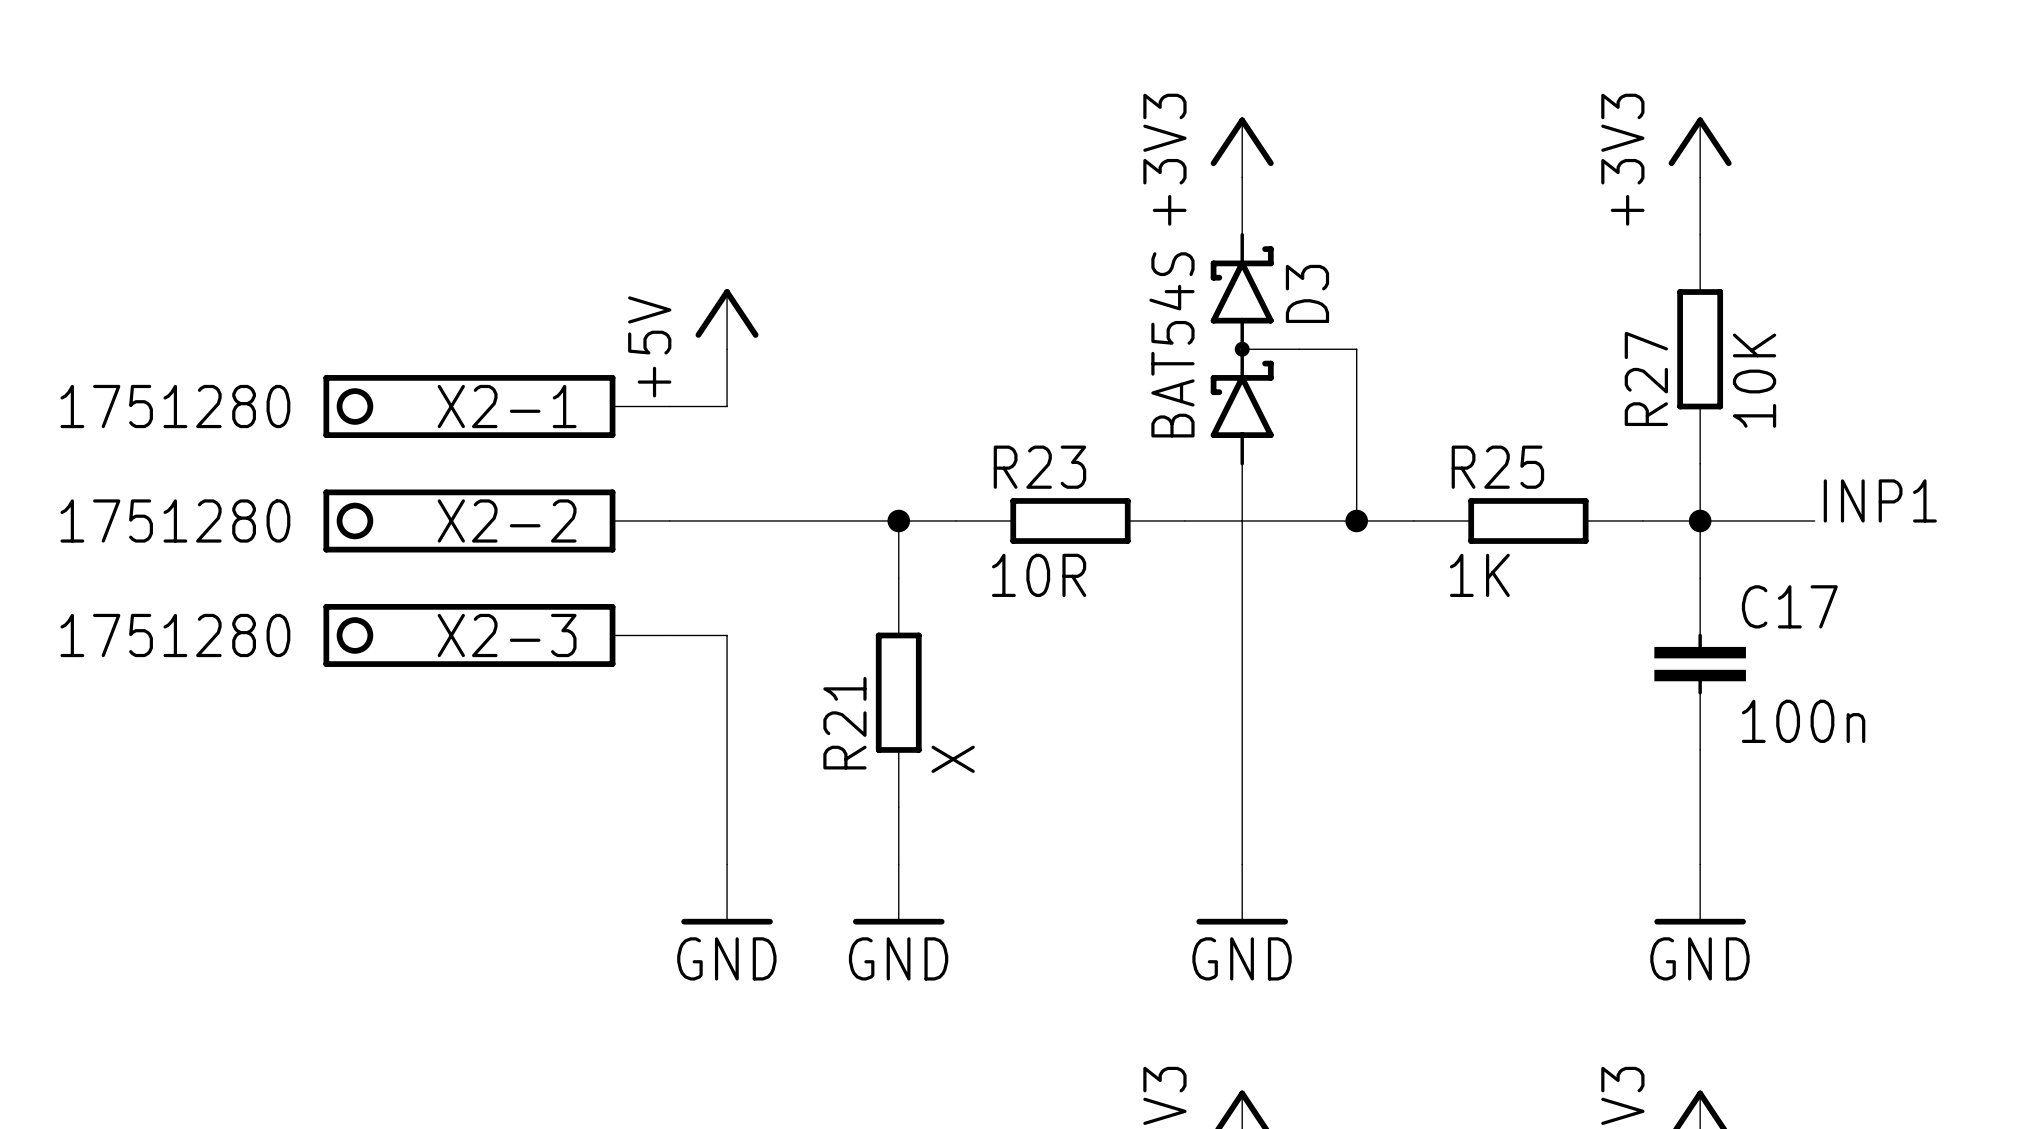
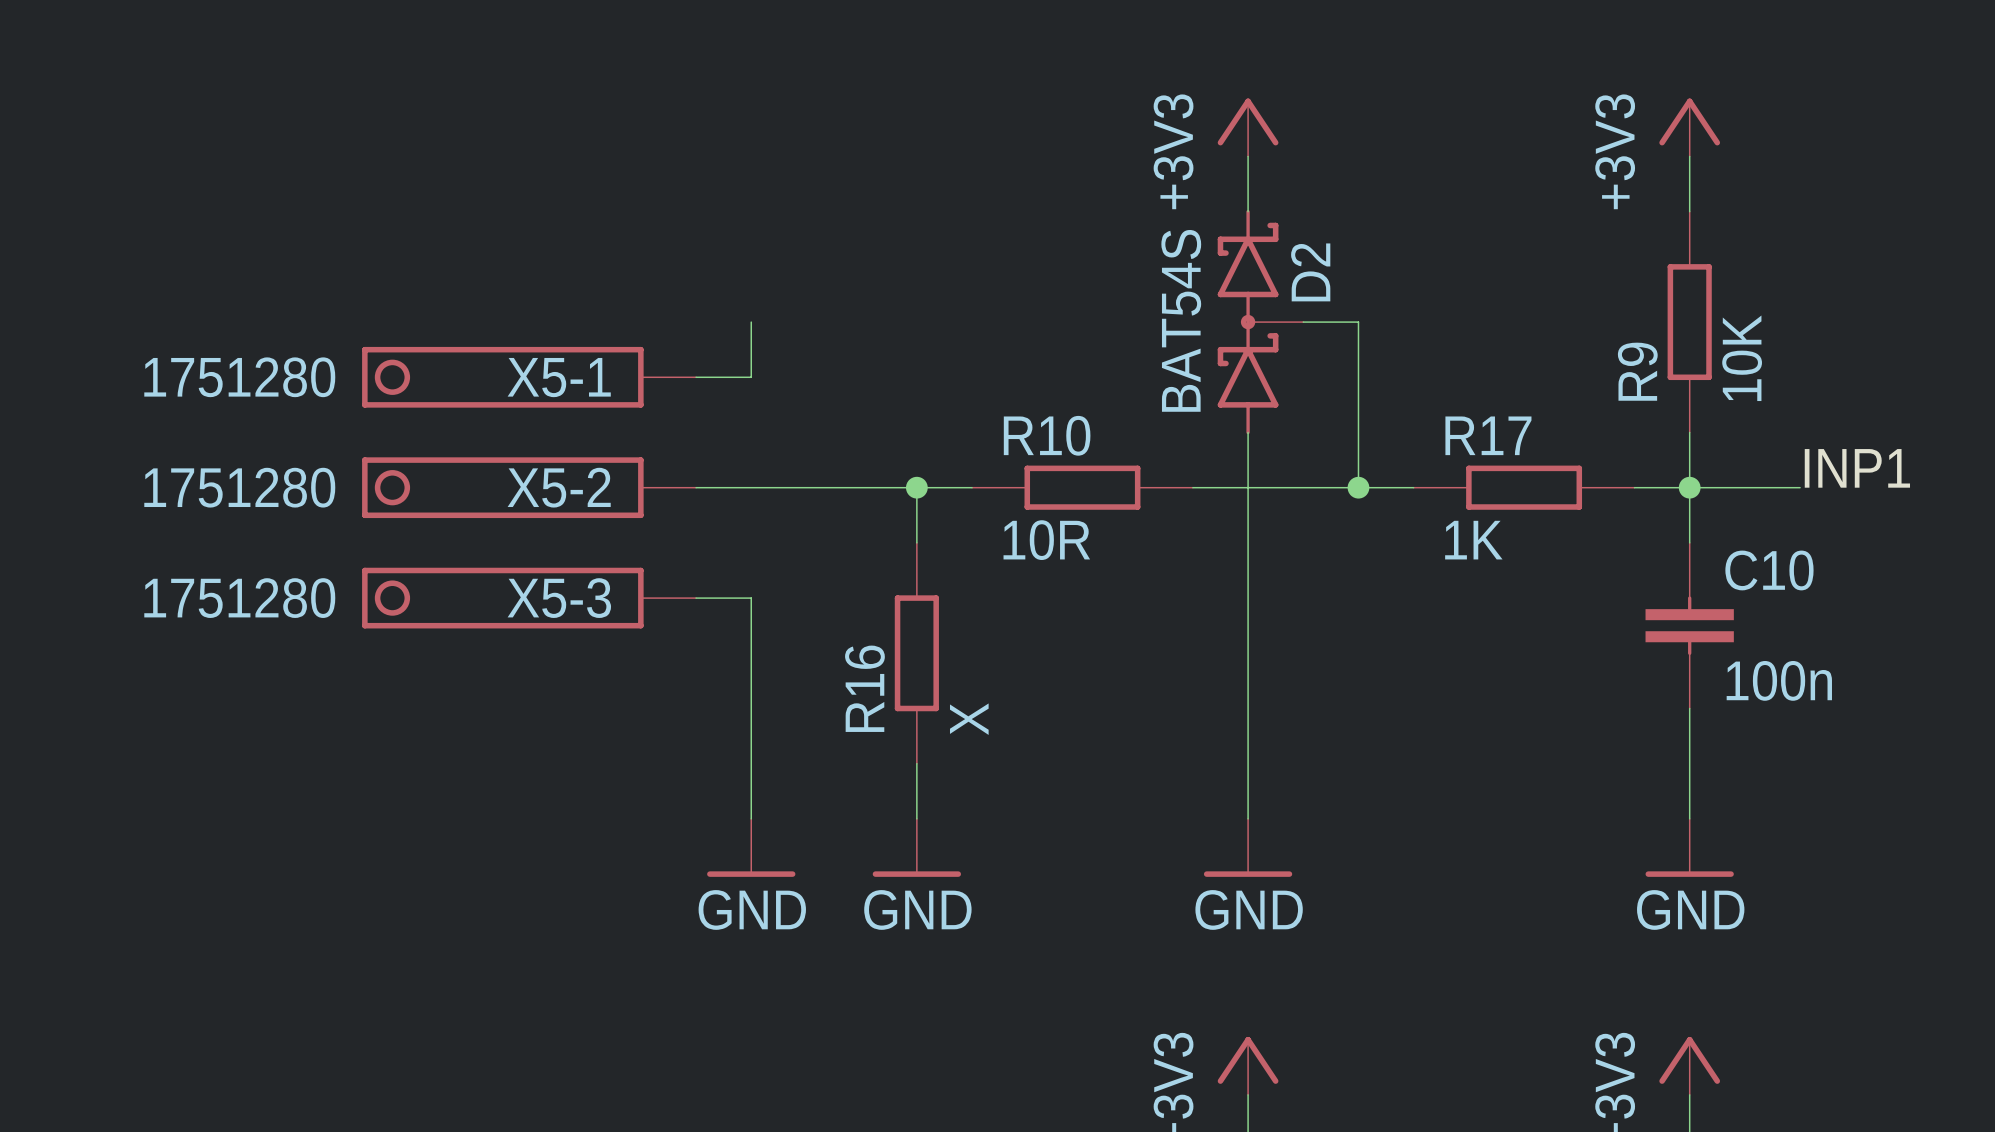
D3 name: D3 (1307, 293) -> D2 (1310, 272)
power symbol: +5V (727, 319) -> none
R27 name: R27 (1646, 378) -> R9 (1637, 371)
X2-1 name: X2-1 (507, 406) -> X5-1 (559, 377)
R23 name: R23 (1039, 467) -> R10 (1047, 435)
R25 name: R25 (1497, 467) -> R17 (1488, 435)
X2-2 name: X2-2 (507, 520) -> X5-2 (559, 487)
C17 name: C17 (1789, 606) -> C10 (1769, 570)
X2-3 name: X2-3 (507, 635) -> X5-3 (559, 598)
R21 name: R21 (844, 723) -> R16 (864, 688)

